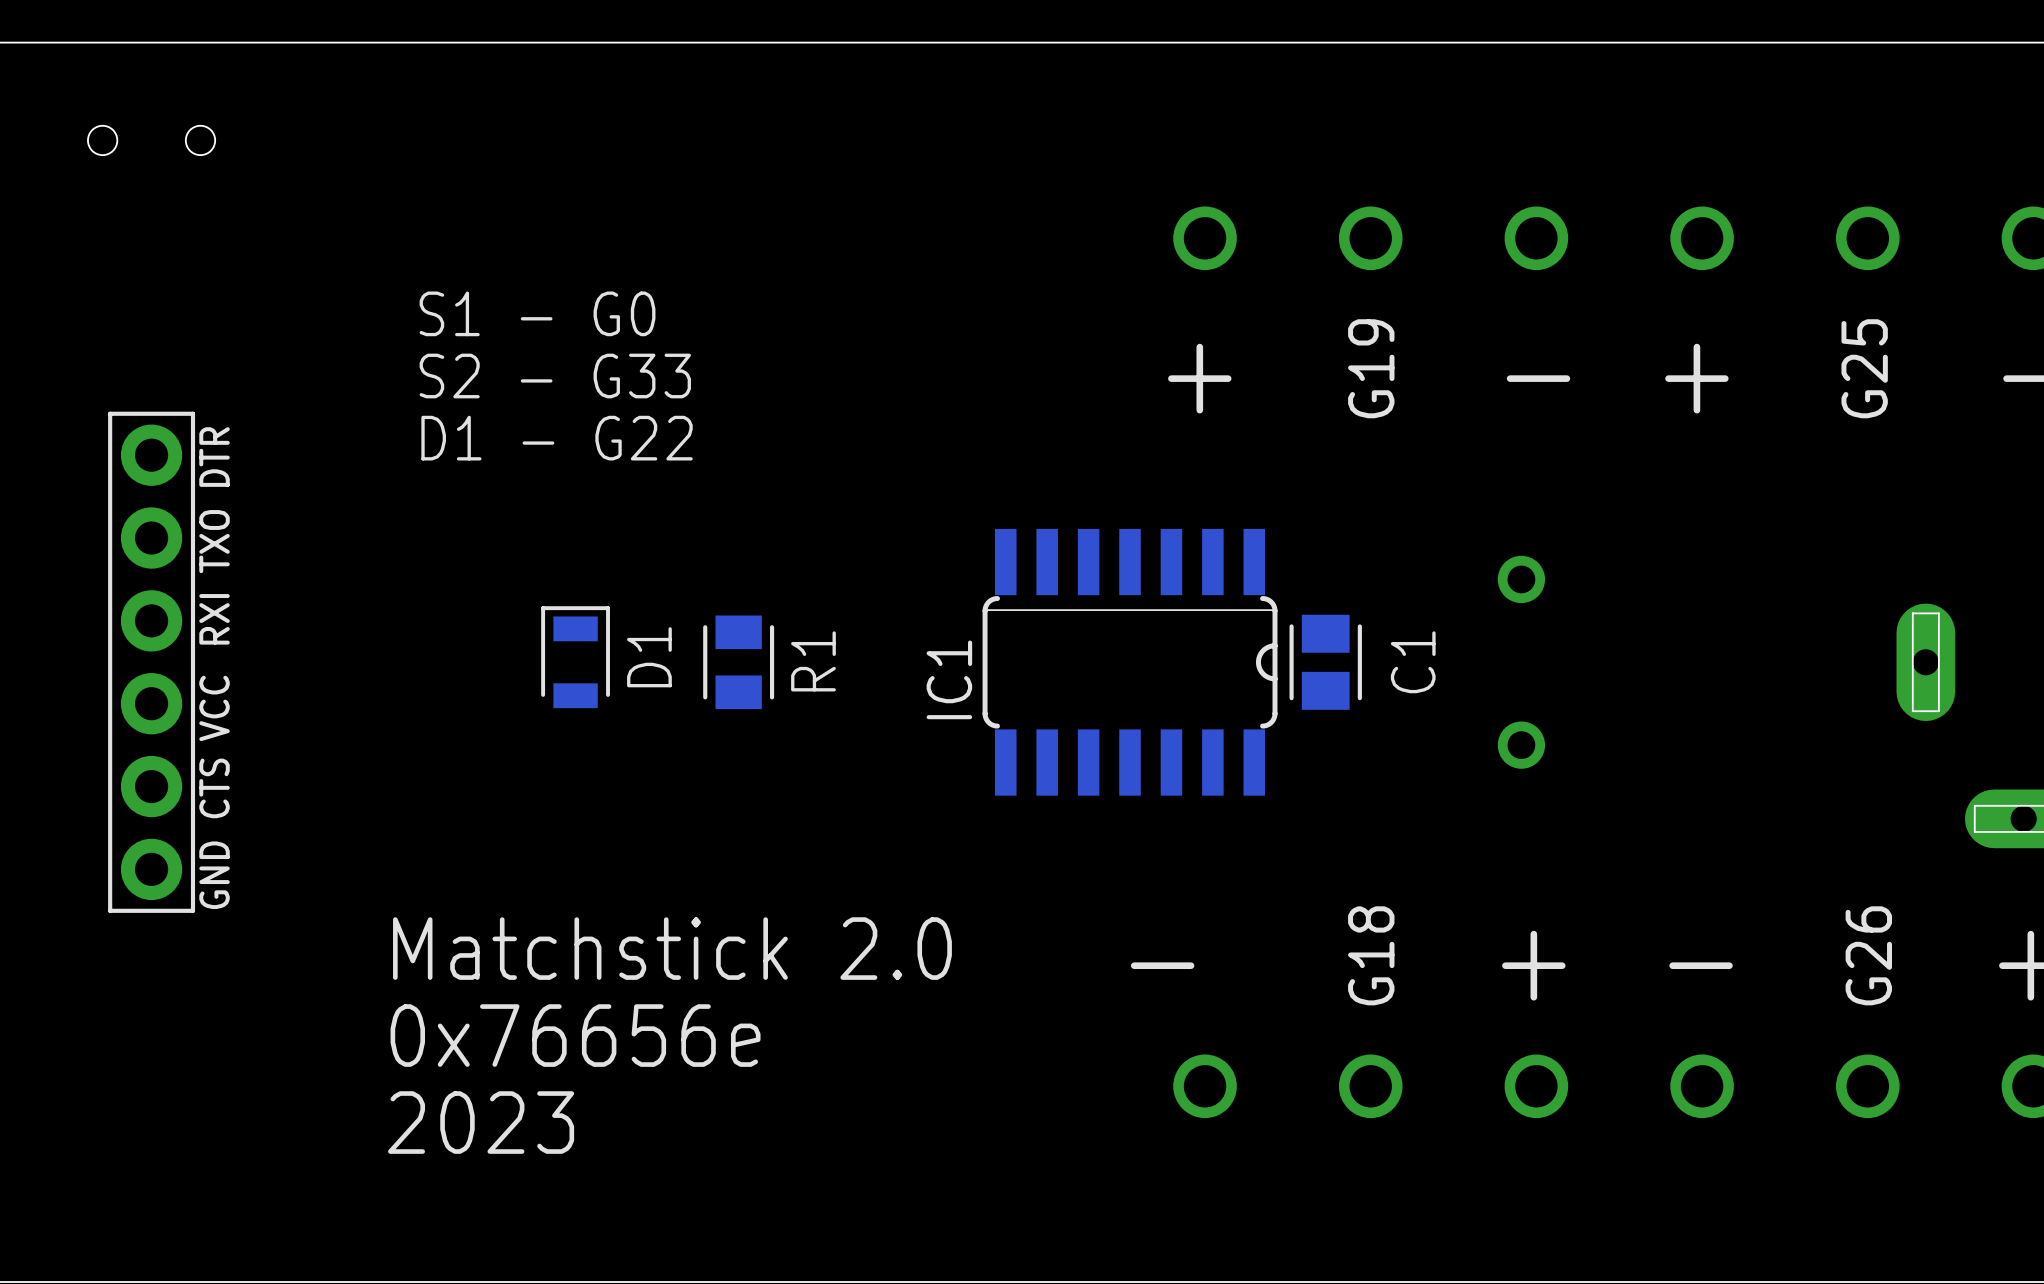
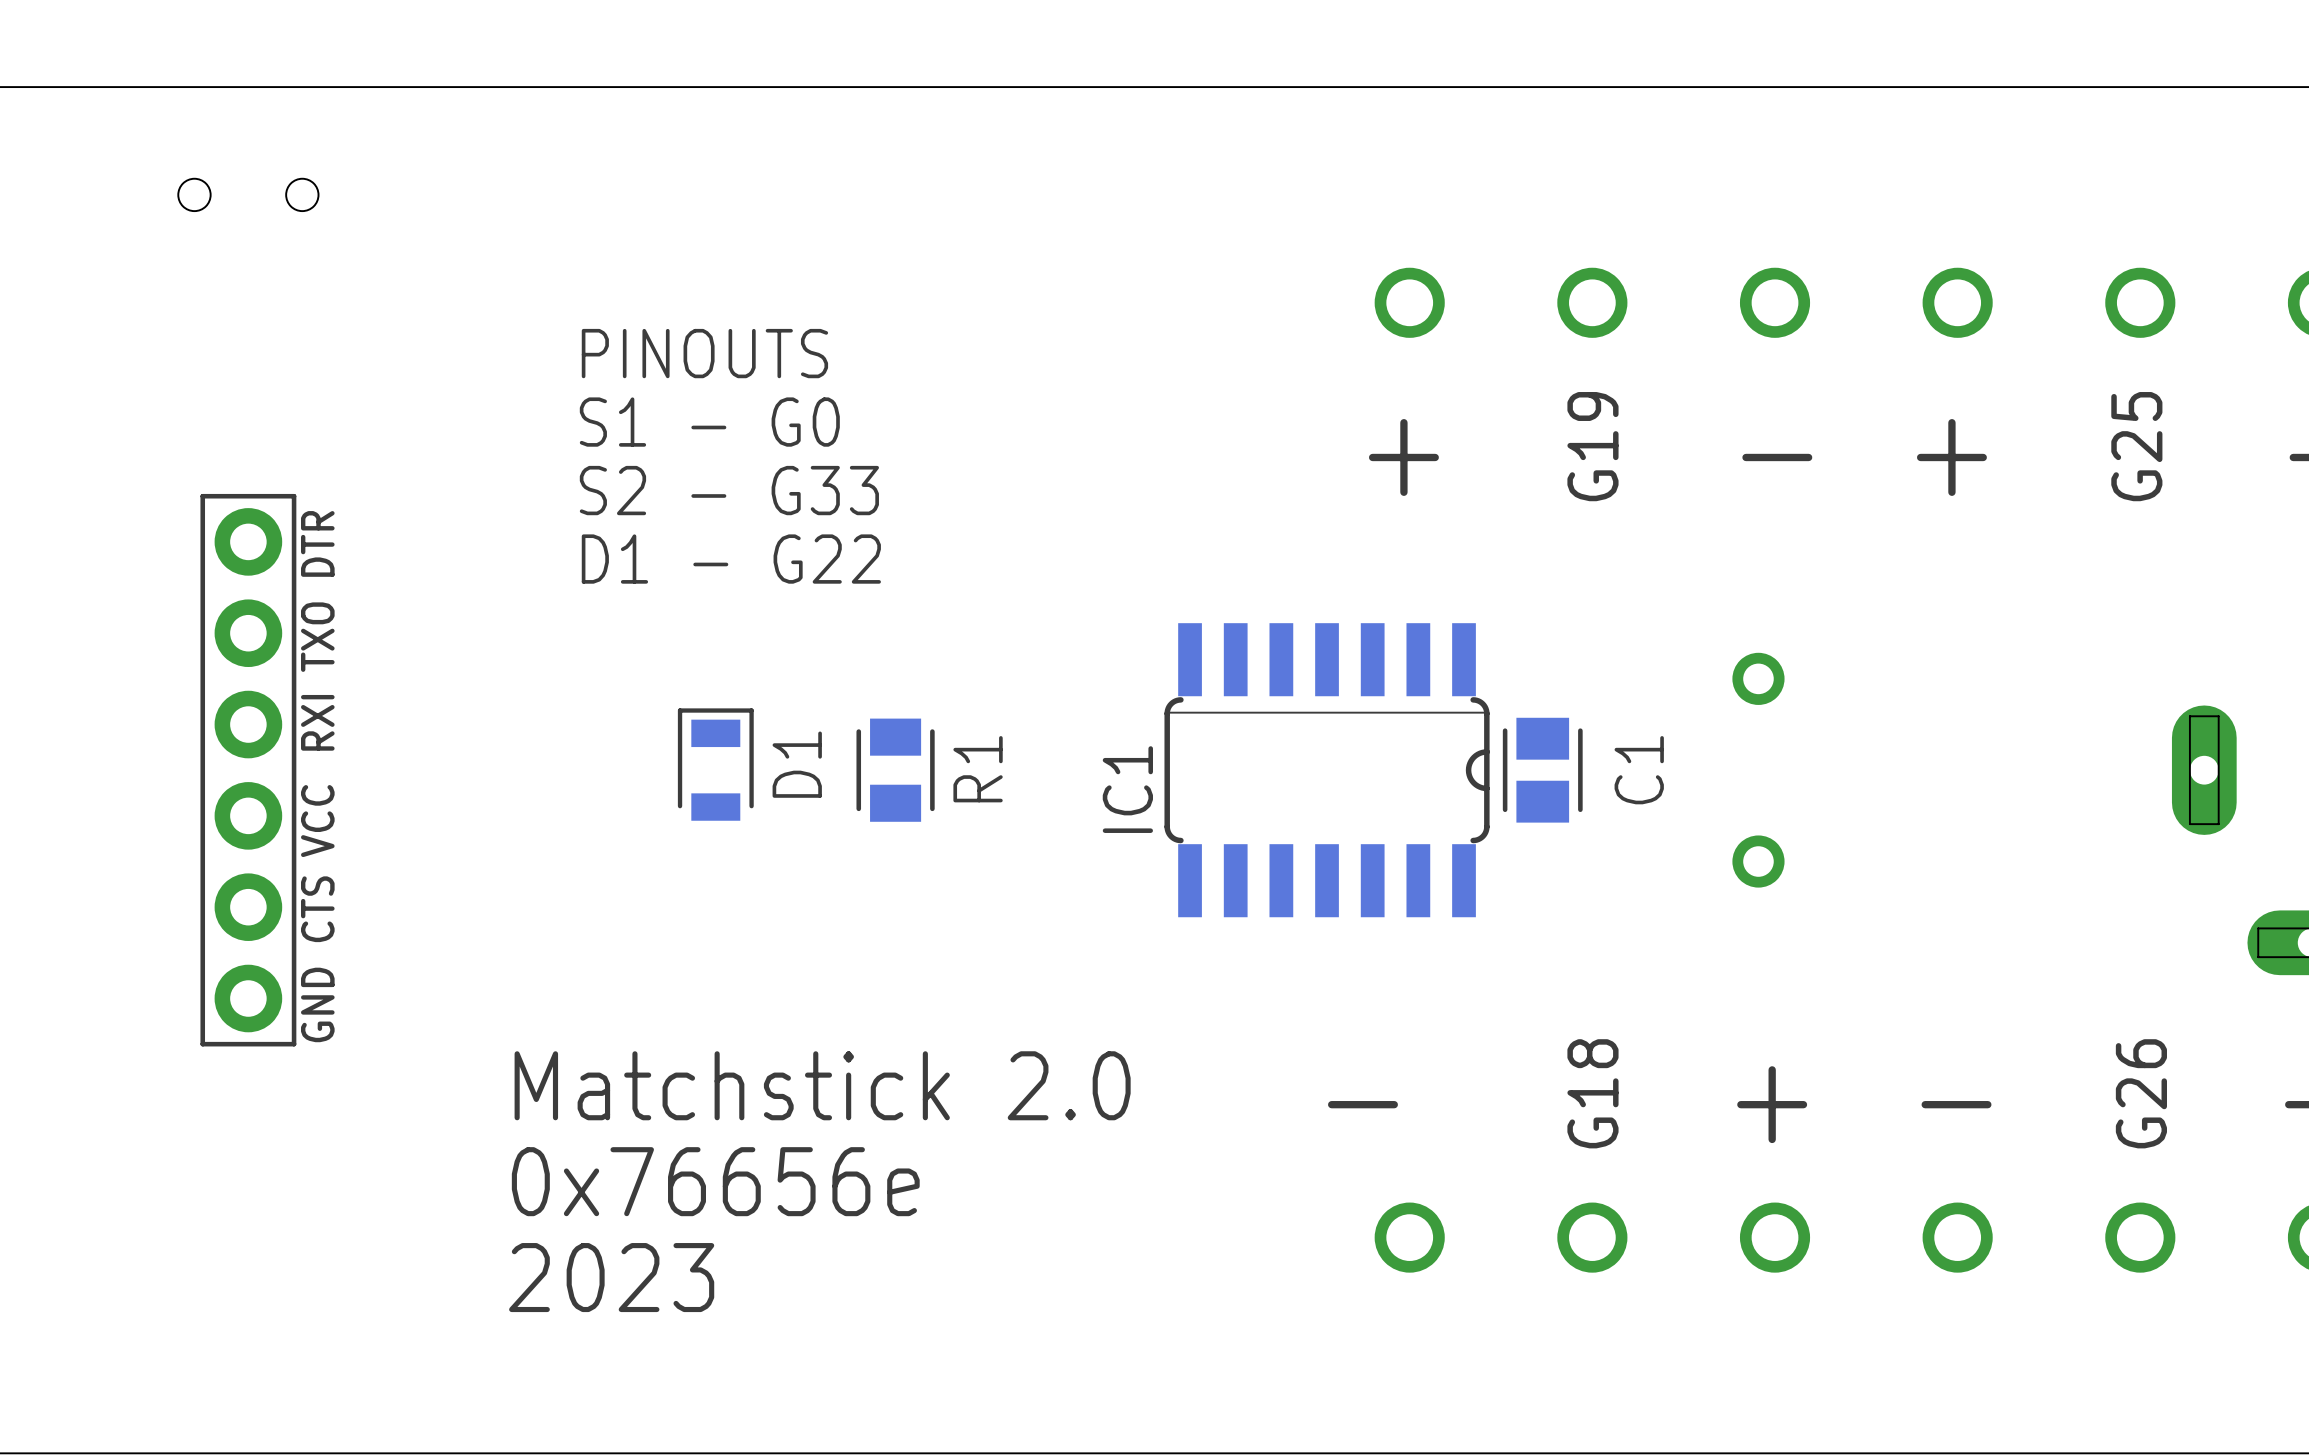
text: none -> PINOUTS (704, 353)
text position: S1 - G0 (537, 313) -> S1 - G0 (709, 422)
text position: S2 - G33 (555, 376) -> S2 - G33 (729, 490)
text position: D1 - G22 (557, 438) -> D1 - G22 (731, 559)

